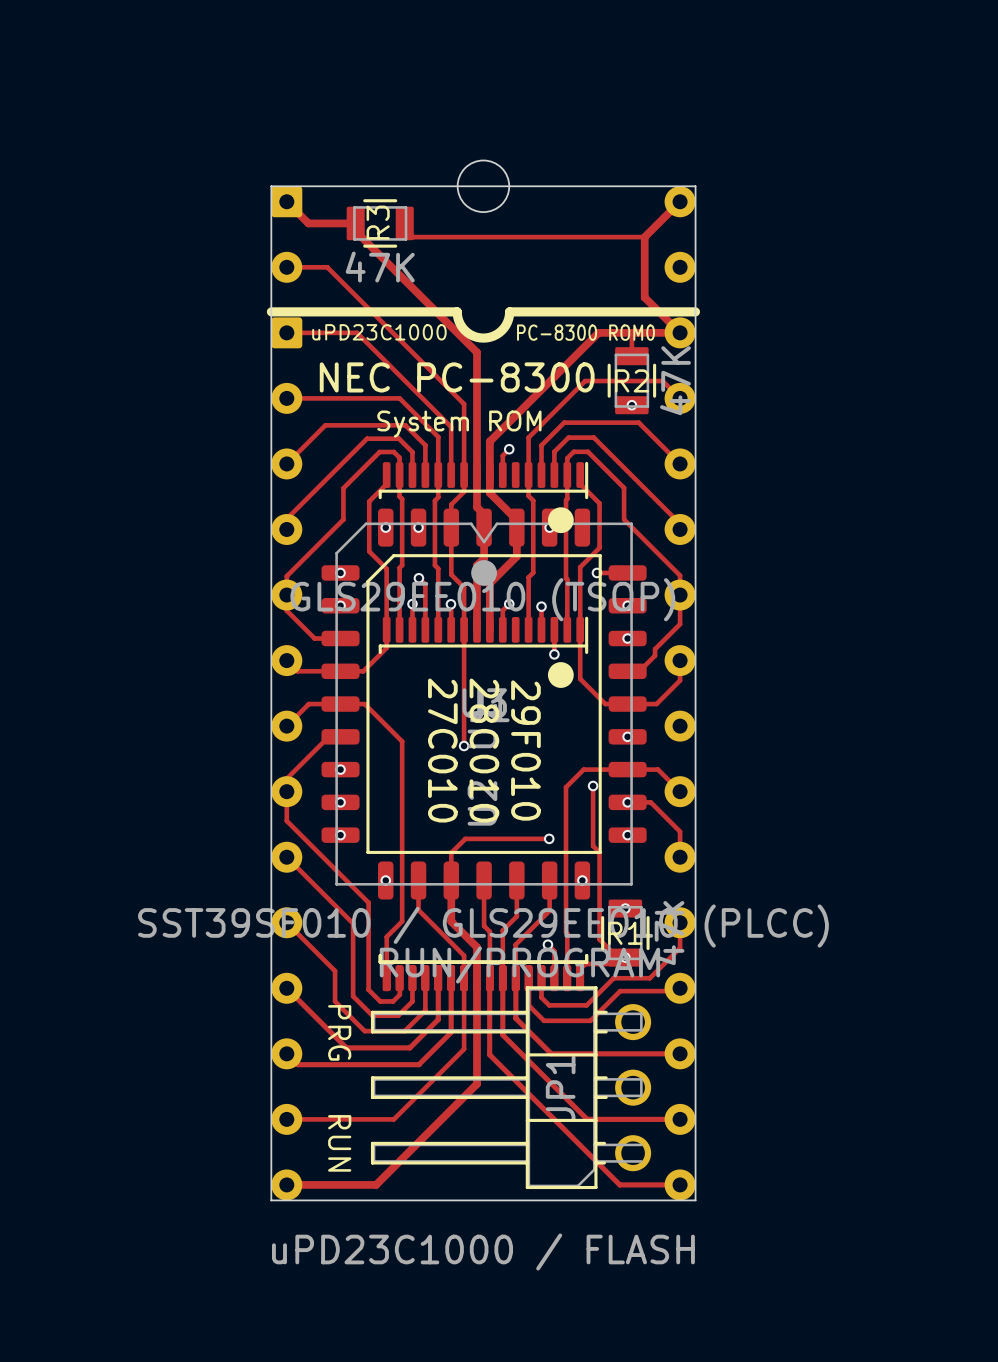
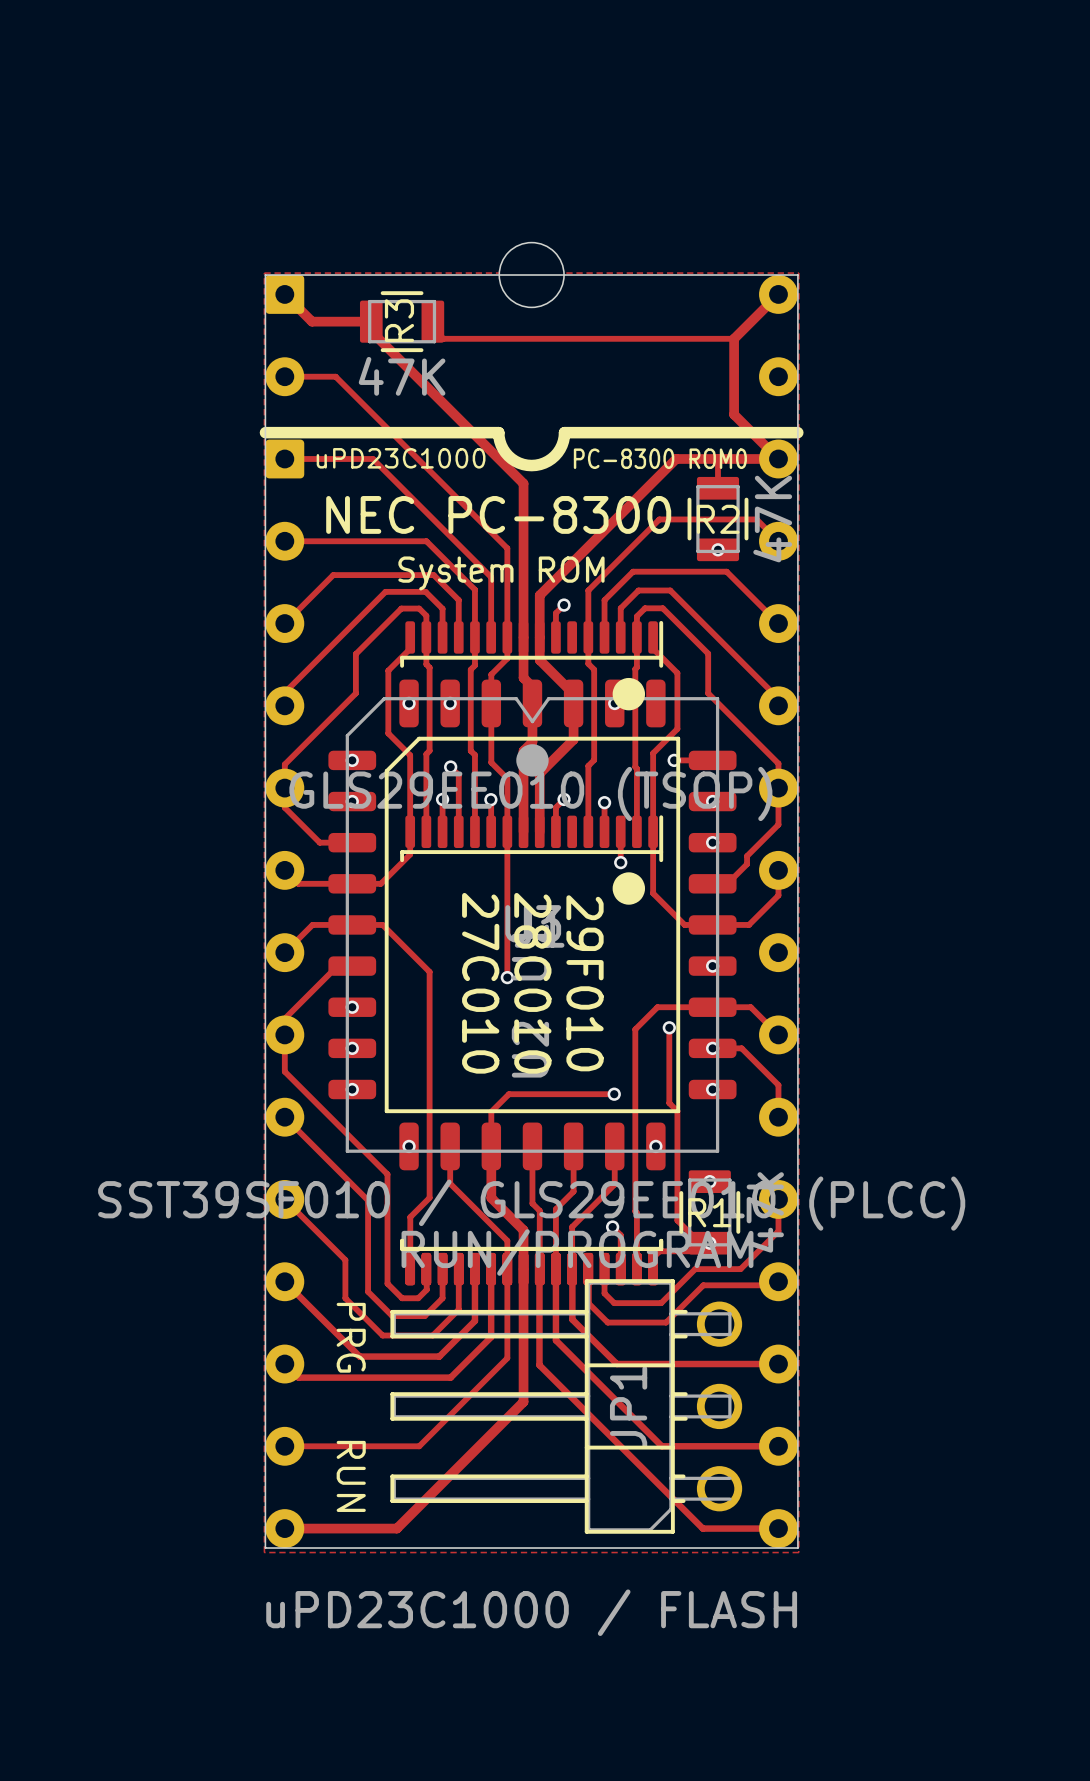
zone outline: none -> (264, 273) (264, 1552) (798, 1552) (798, 273) (264, 273)

